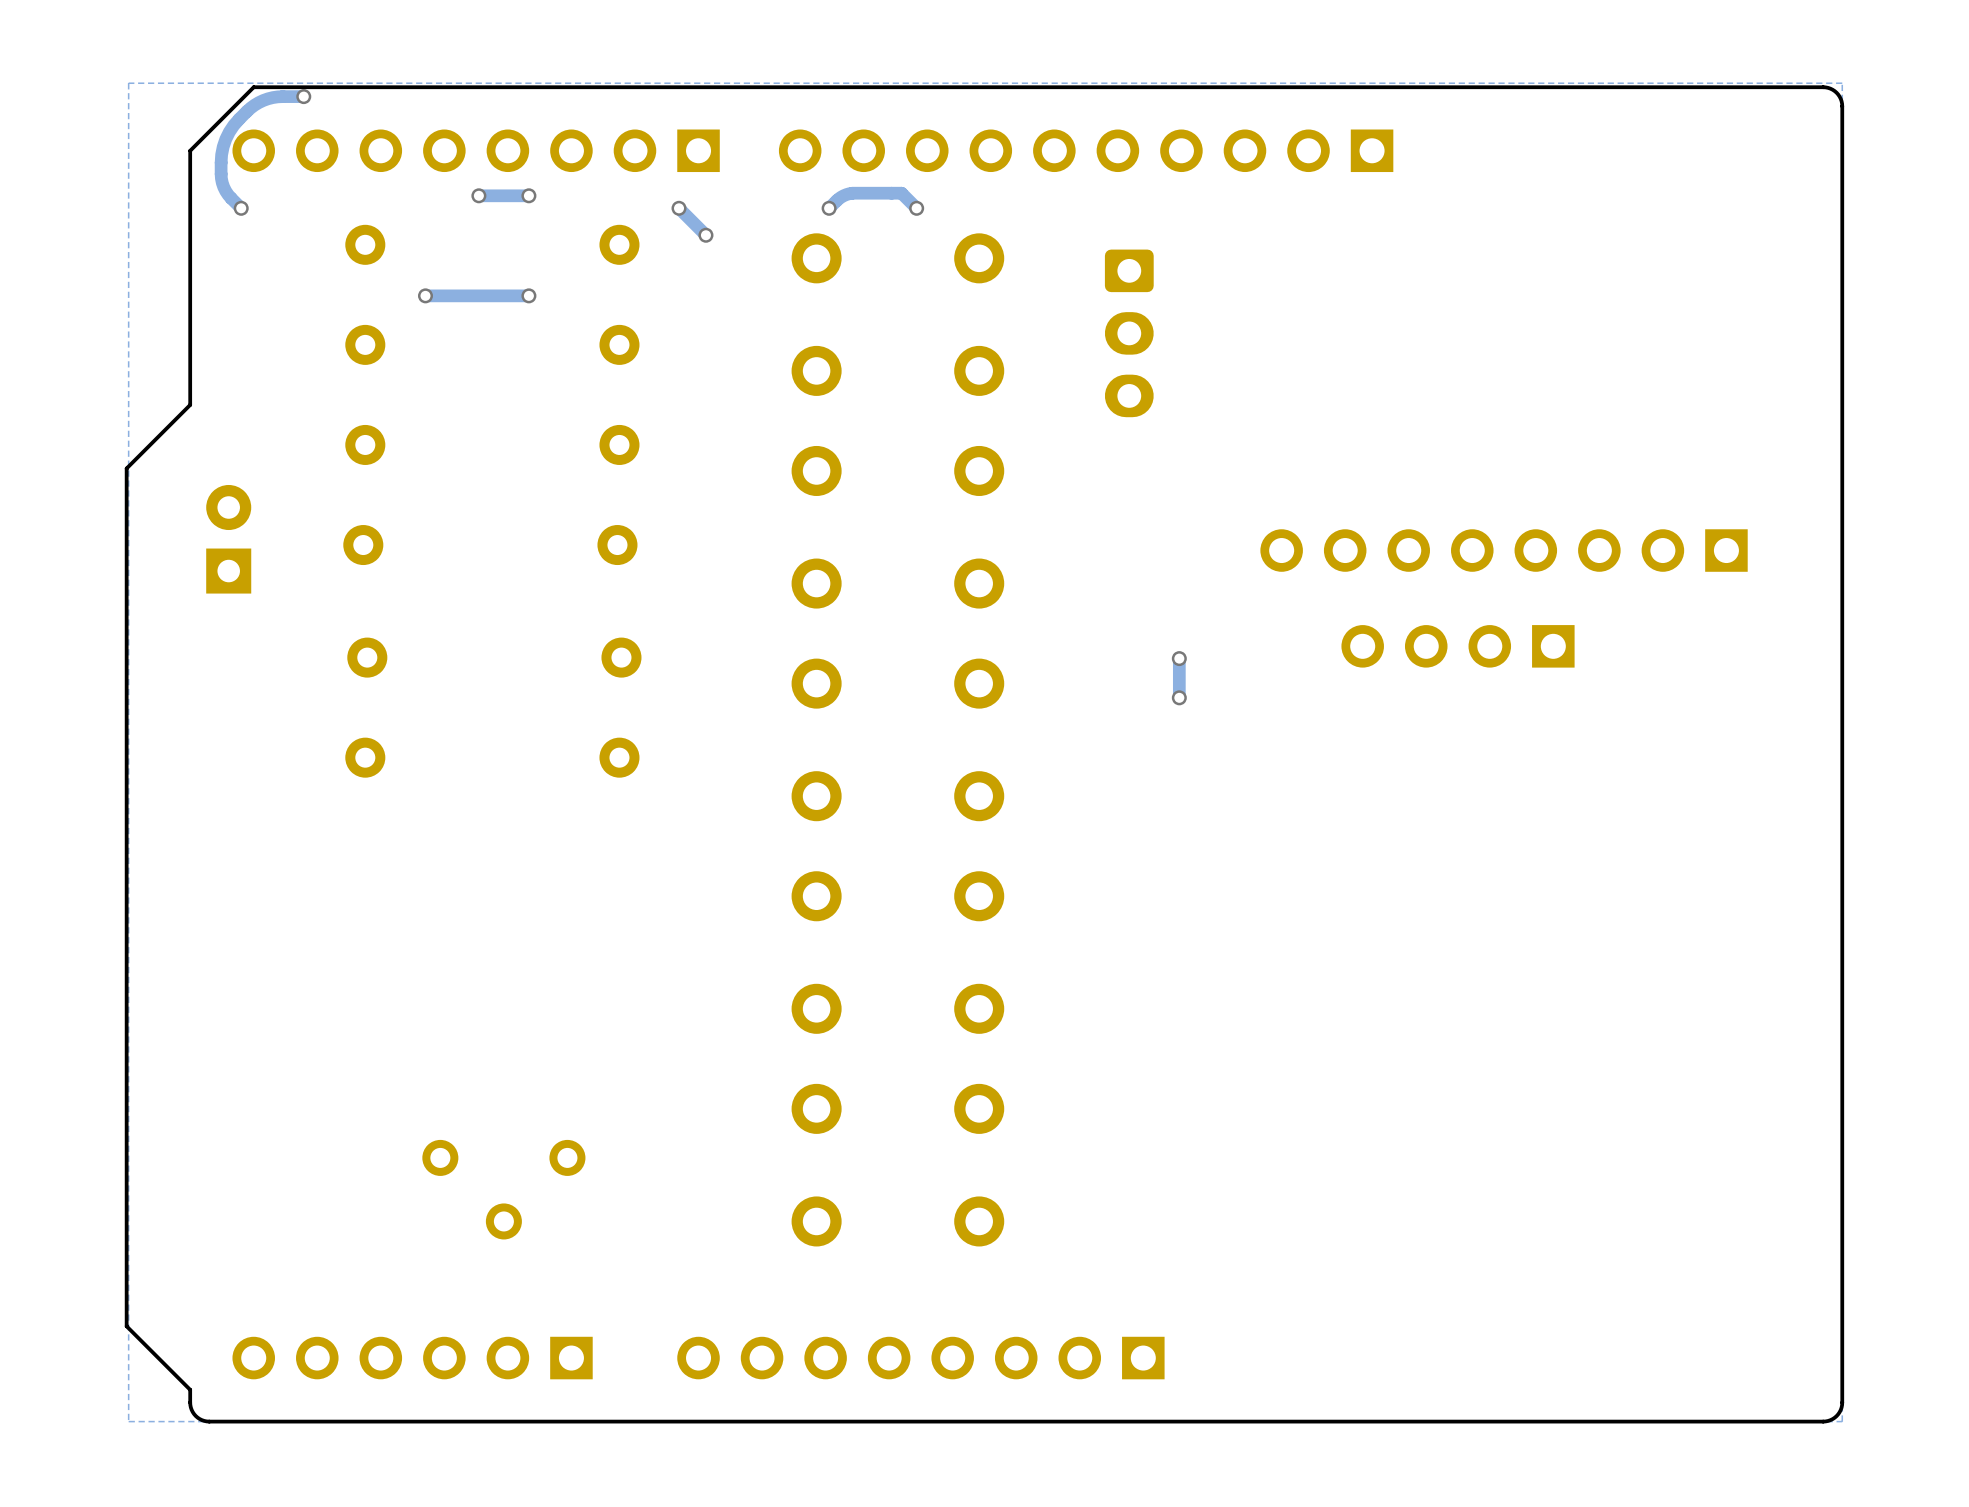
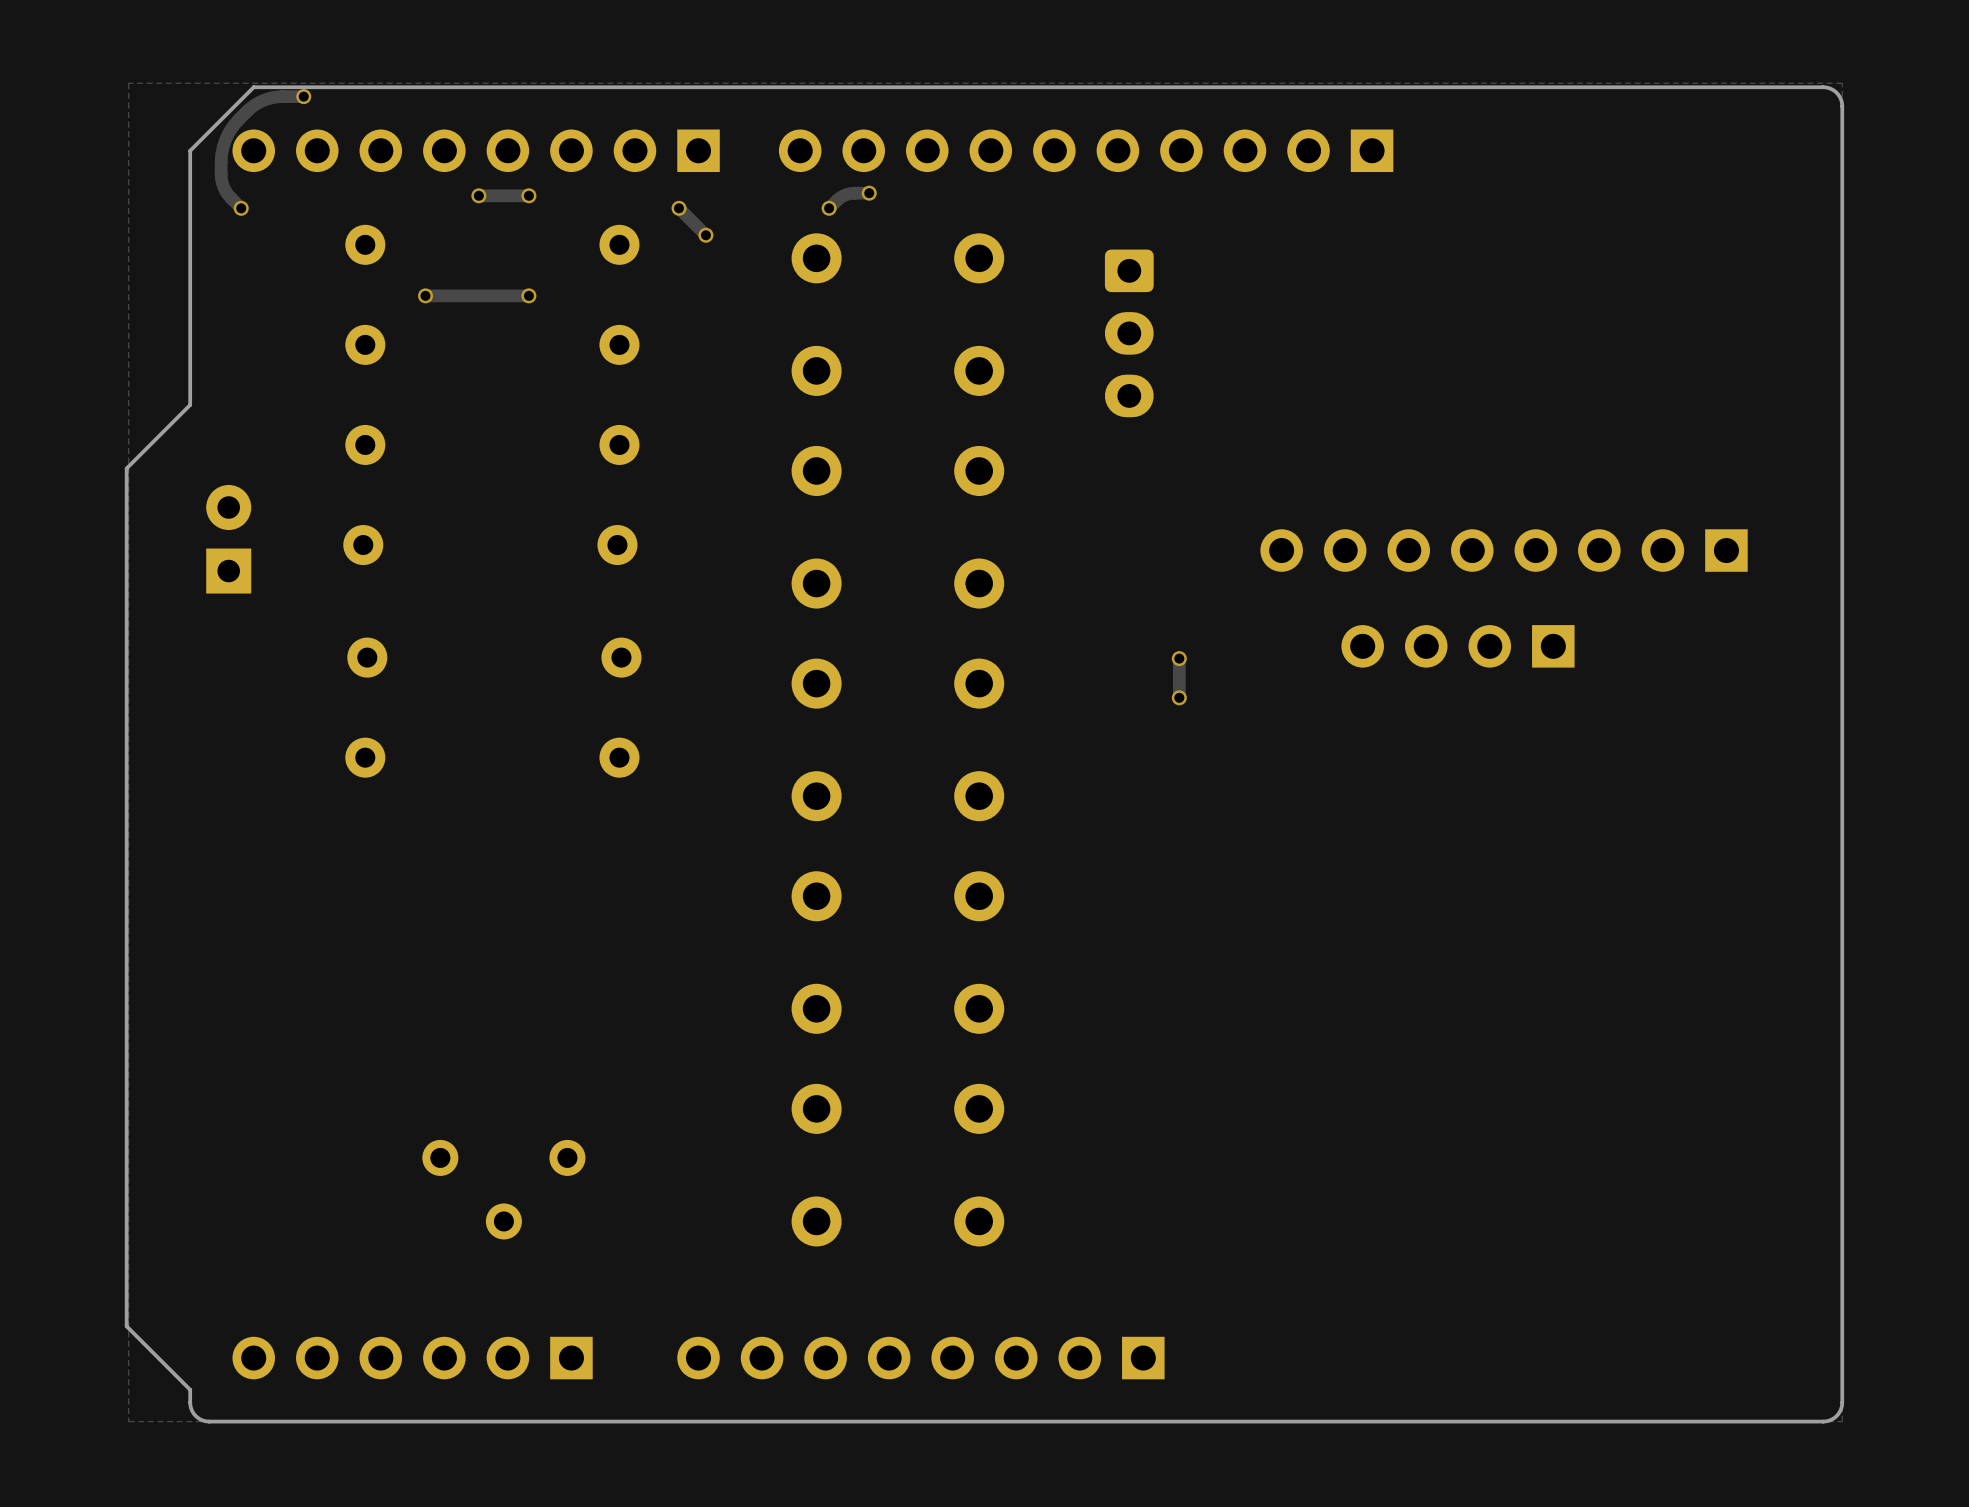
track: (836, 200) (852, 193) (901, 193) (916, 208) -> (836, 200) (849, 193) (869, 193)
via position: (916, 208) -> (869, 193)

